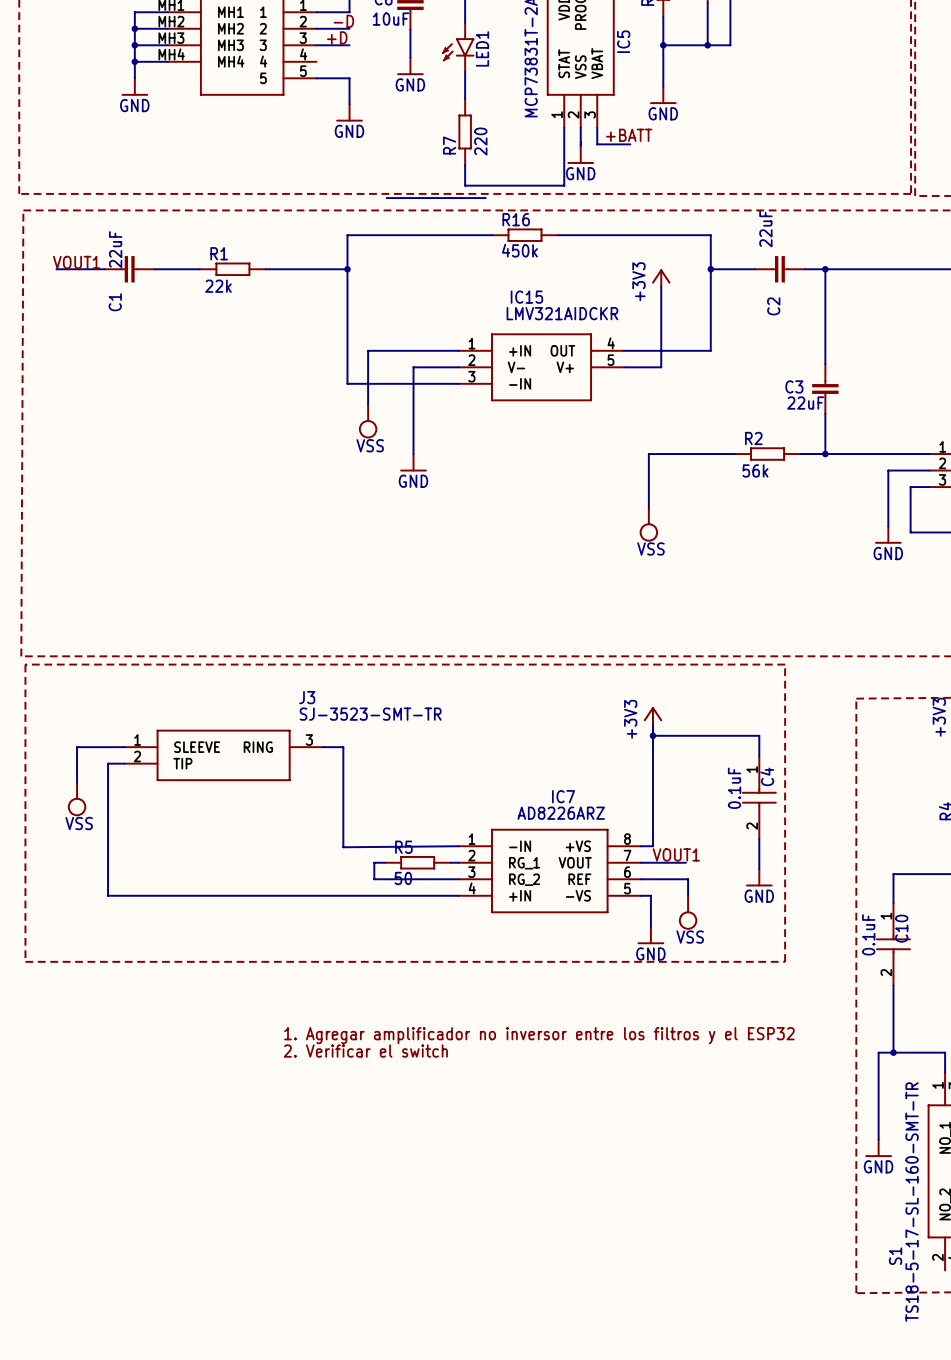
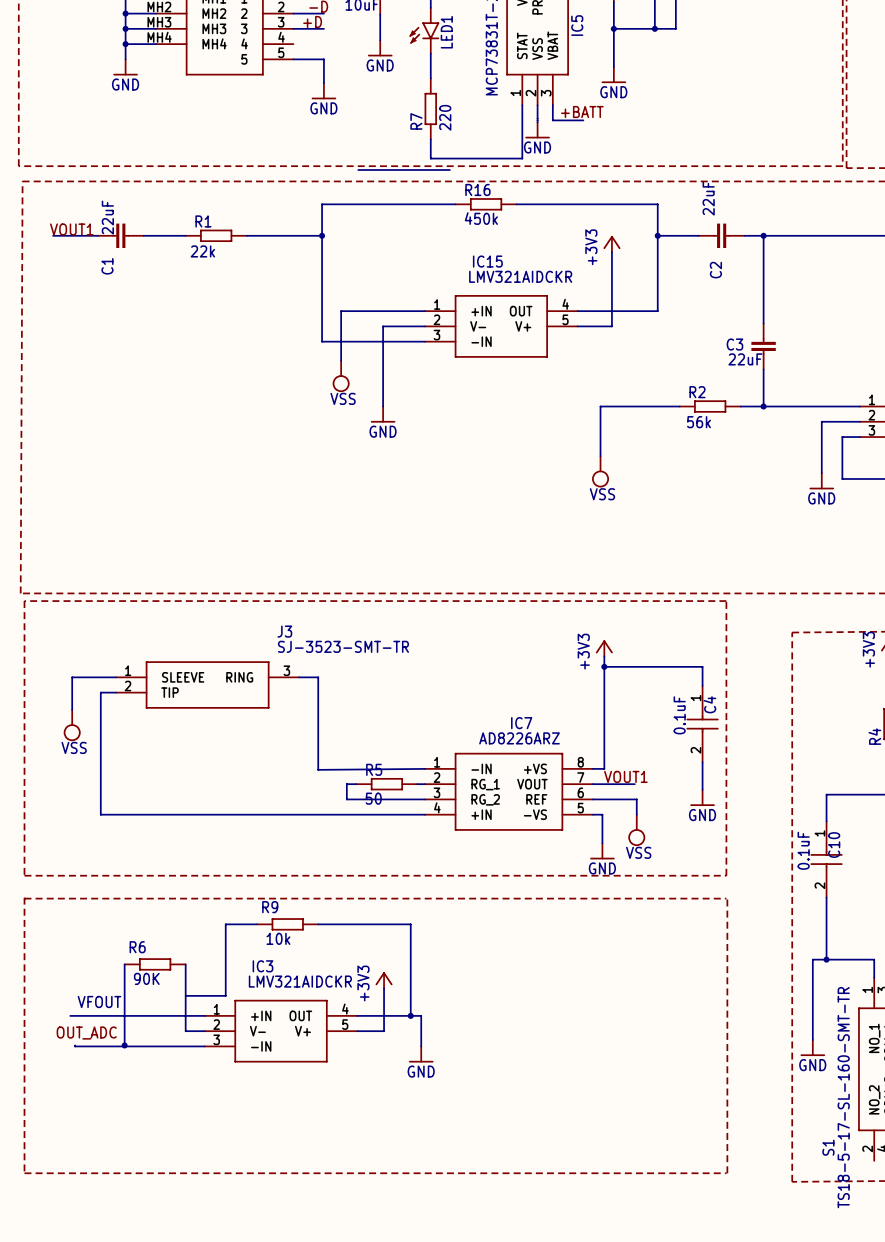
line: none -> (24, 897) (24, 1172)
line: none -> (24, 898) (726, 898)
line: none -> (727, 898) (727, 1173)
wire: none -> (257, 924) (225, 924) (225, 995) (186, 995)
R9: none -> 10k (287, 924)
wire: none -> (318, 924) (410, 924) (410, 1015)
text: 1. Agregar amplificador no inversor entre los filtros y el ESP32 (539, 1035) -> none
text: 2. Verificar el switch (365, 1051) -> none
wire: none -> (124, 964) (124, 1046)
R6: none -> 90K (155, 964)
wire: none -> (185, 964) (185, 1031) (204, 1031)
power symbol: none -> +3V3 (384, 980)
wire: none -> (384, 988) (384, 1031) (357, 1031)
text: none -> VFOUT (99, 1001)
wire: none -> (70, 1015) (204, 1015)
wire: none -> (357, 1015) (421, 1015) (421, 1046)
junction: none -> (410, 1015)
IC3: none -> LMV321AIDCKR (281, 1031)
label: none -> OUT_ADC (86, 1033)
wire: none -> (75, 1045) (204, 1046)
junction: none -> (124, 1045)
power symbol: none -> GND (421, 1054)
line: none -> (24, 1173) (726, 1173)

